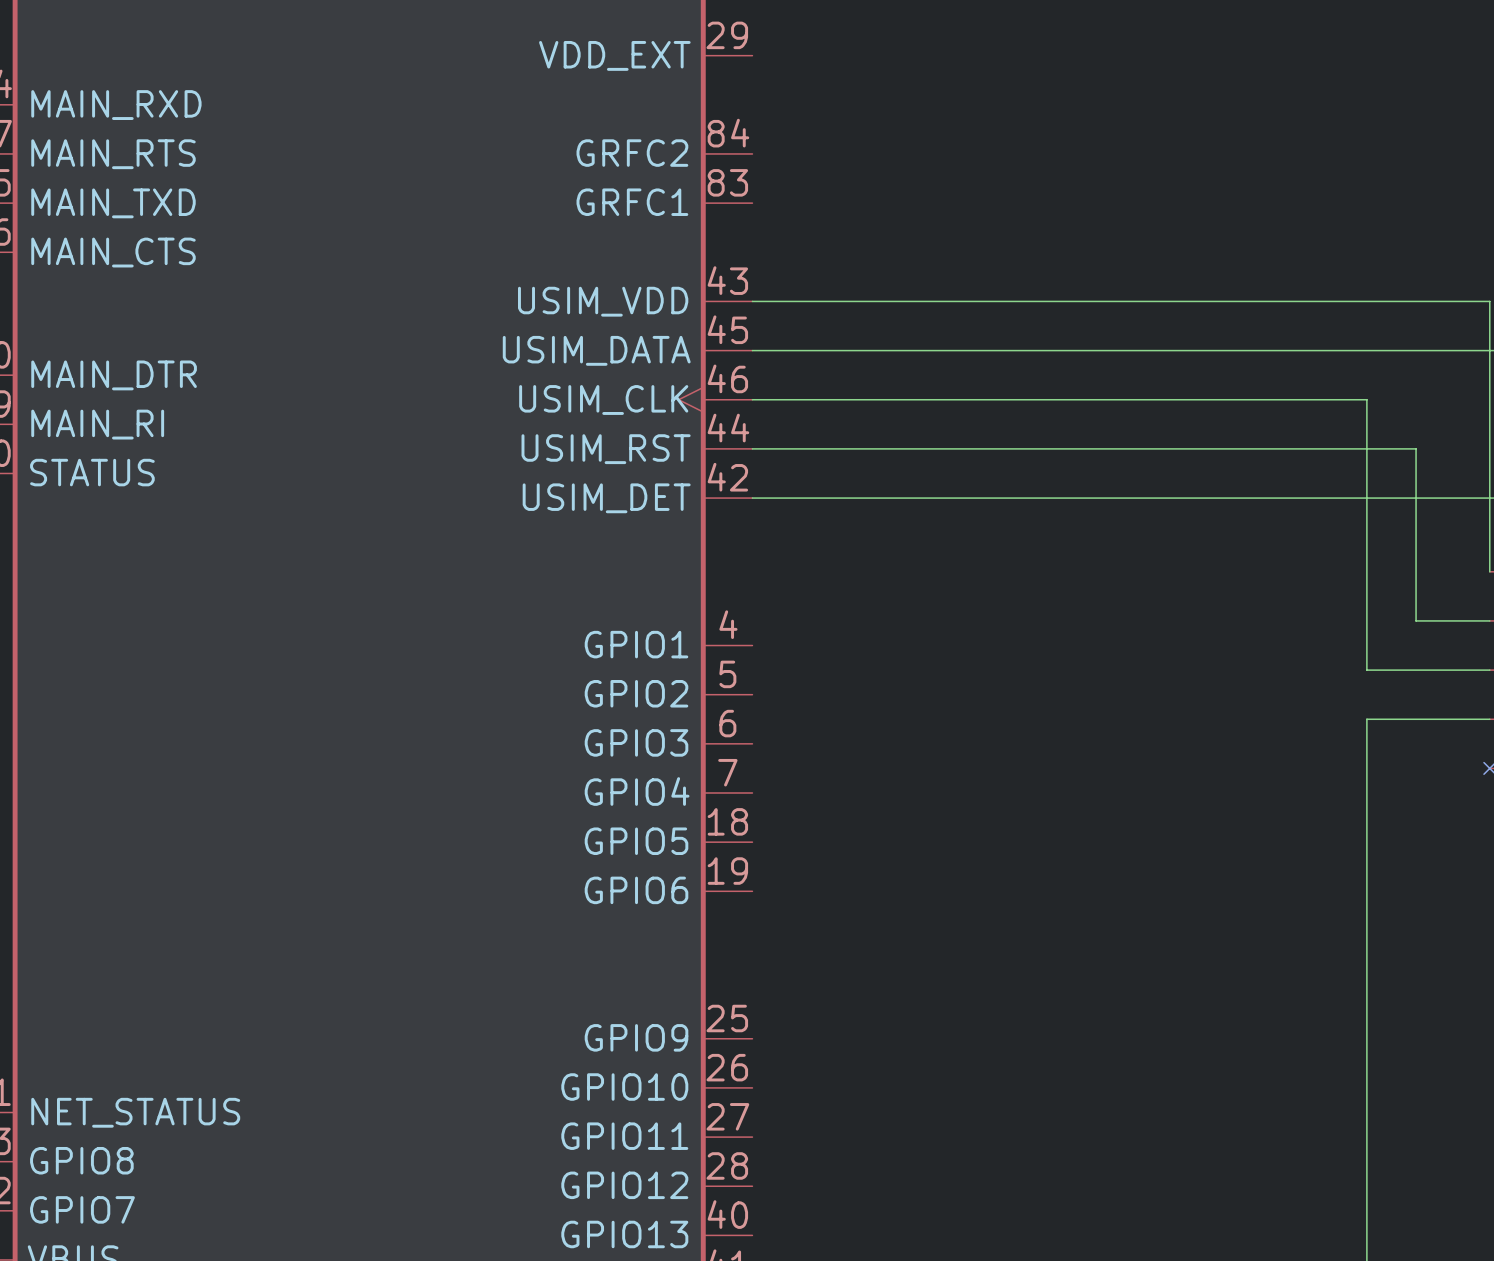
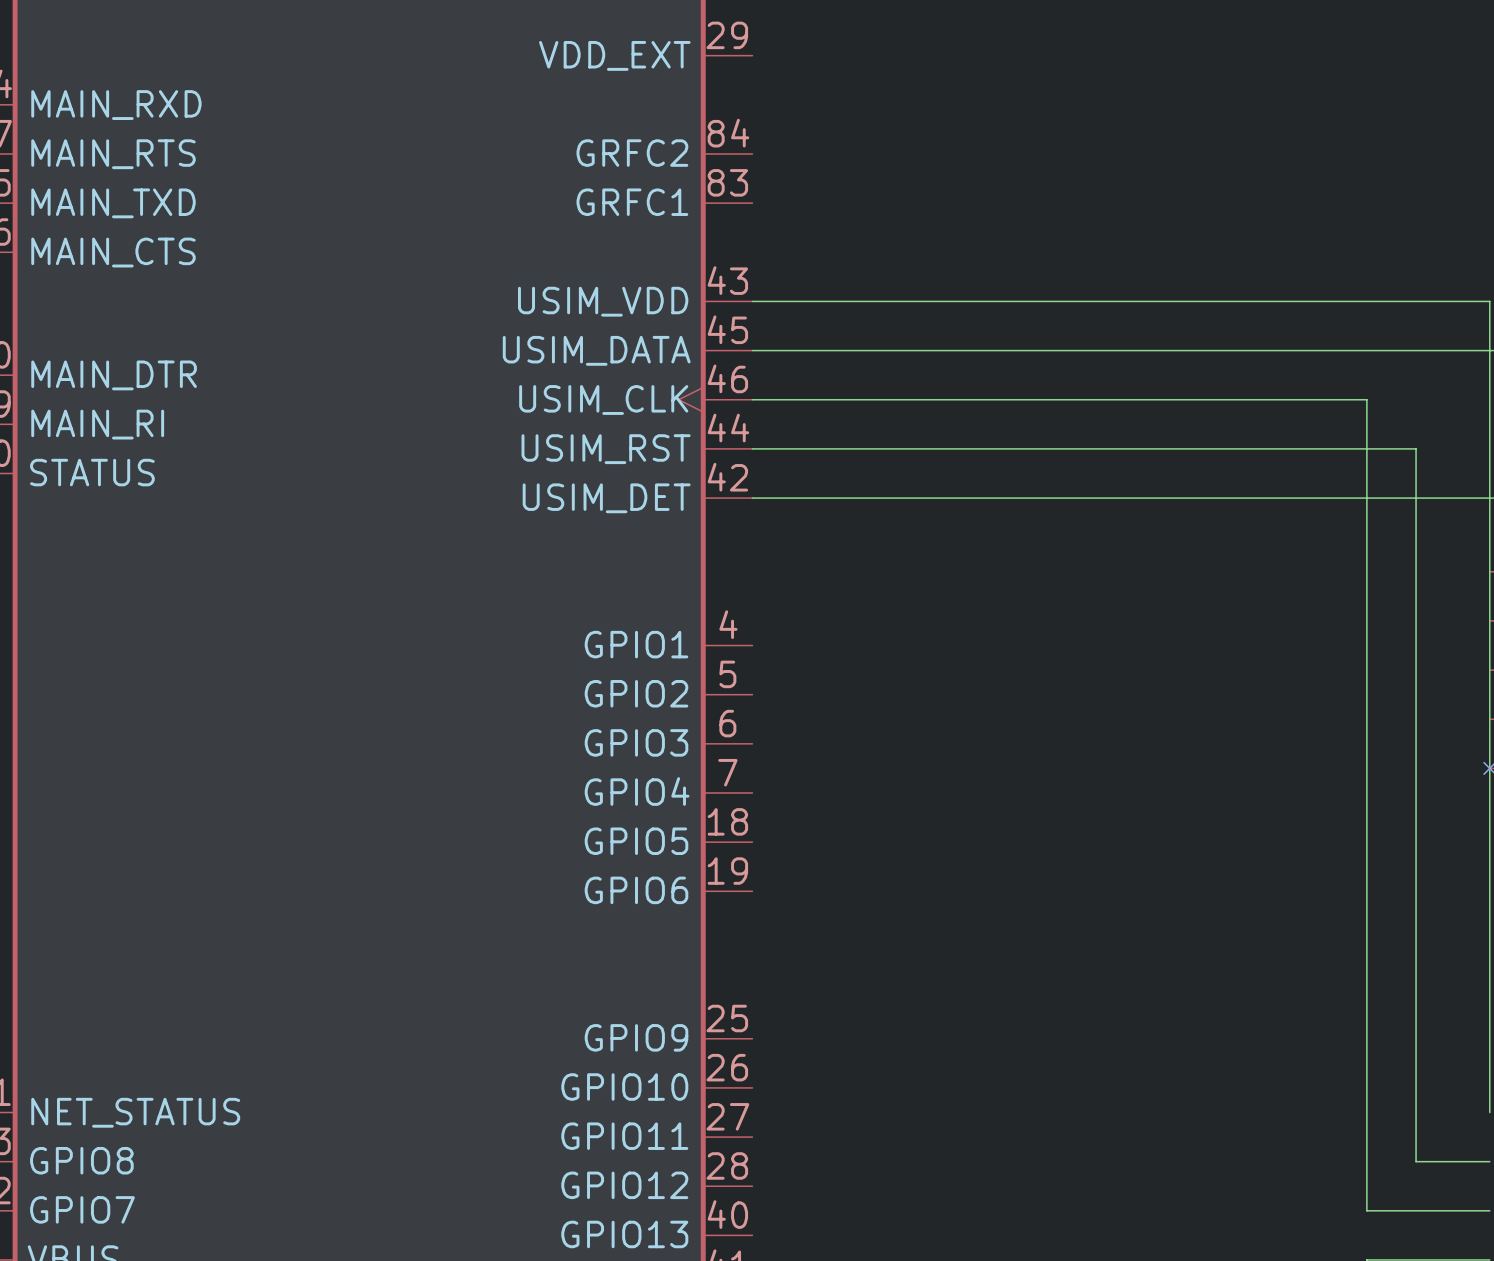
wire: none -> (1489, 571) (1489, 1112)
wire: (1416, 620) (1489, 620) -> (1416, 620) (1416, 1161) (1489, 1161)
wire: (1366, 670) (1489, 670) -> (1366, 670) (1366, 719)
wire: (1366, 719) (1489, 719) -> none
wire: (1366, 1210) (1366, 1259) -> (1366, 1210) (1489, 1210)
wire: none -> (1366, 1259) (1489, 1259)

